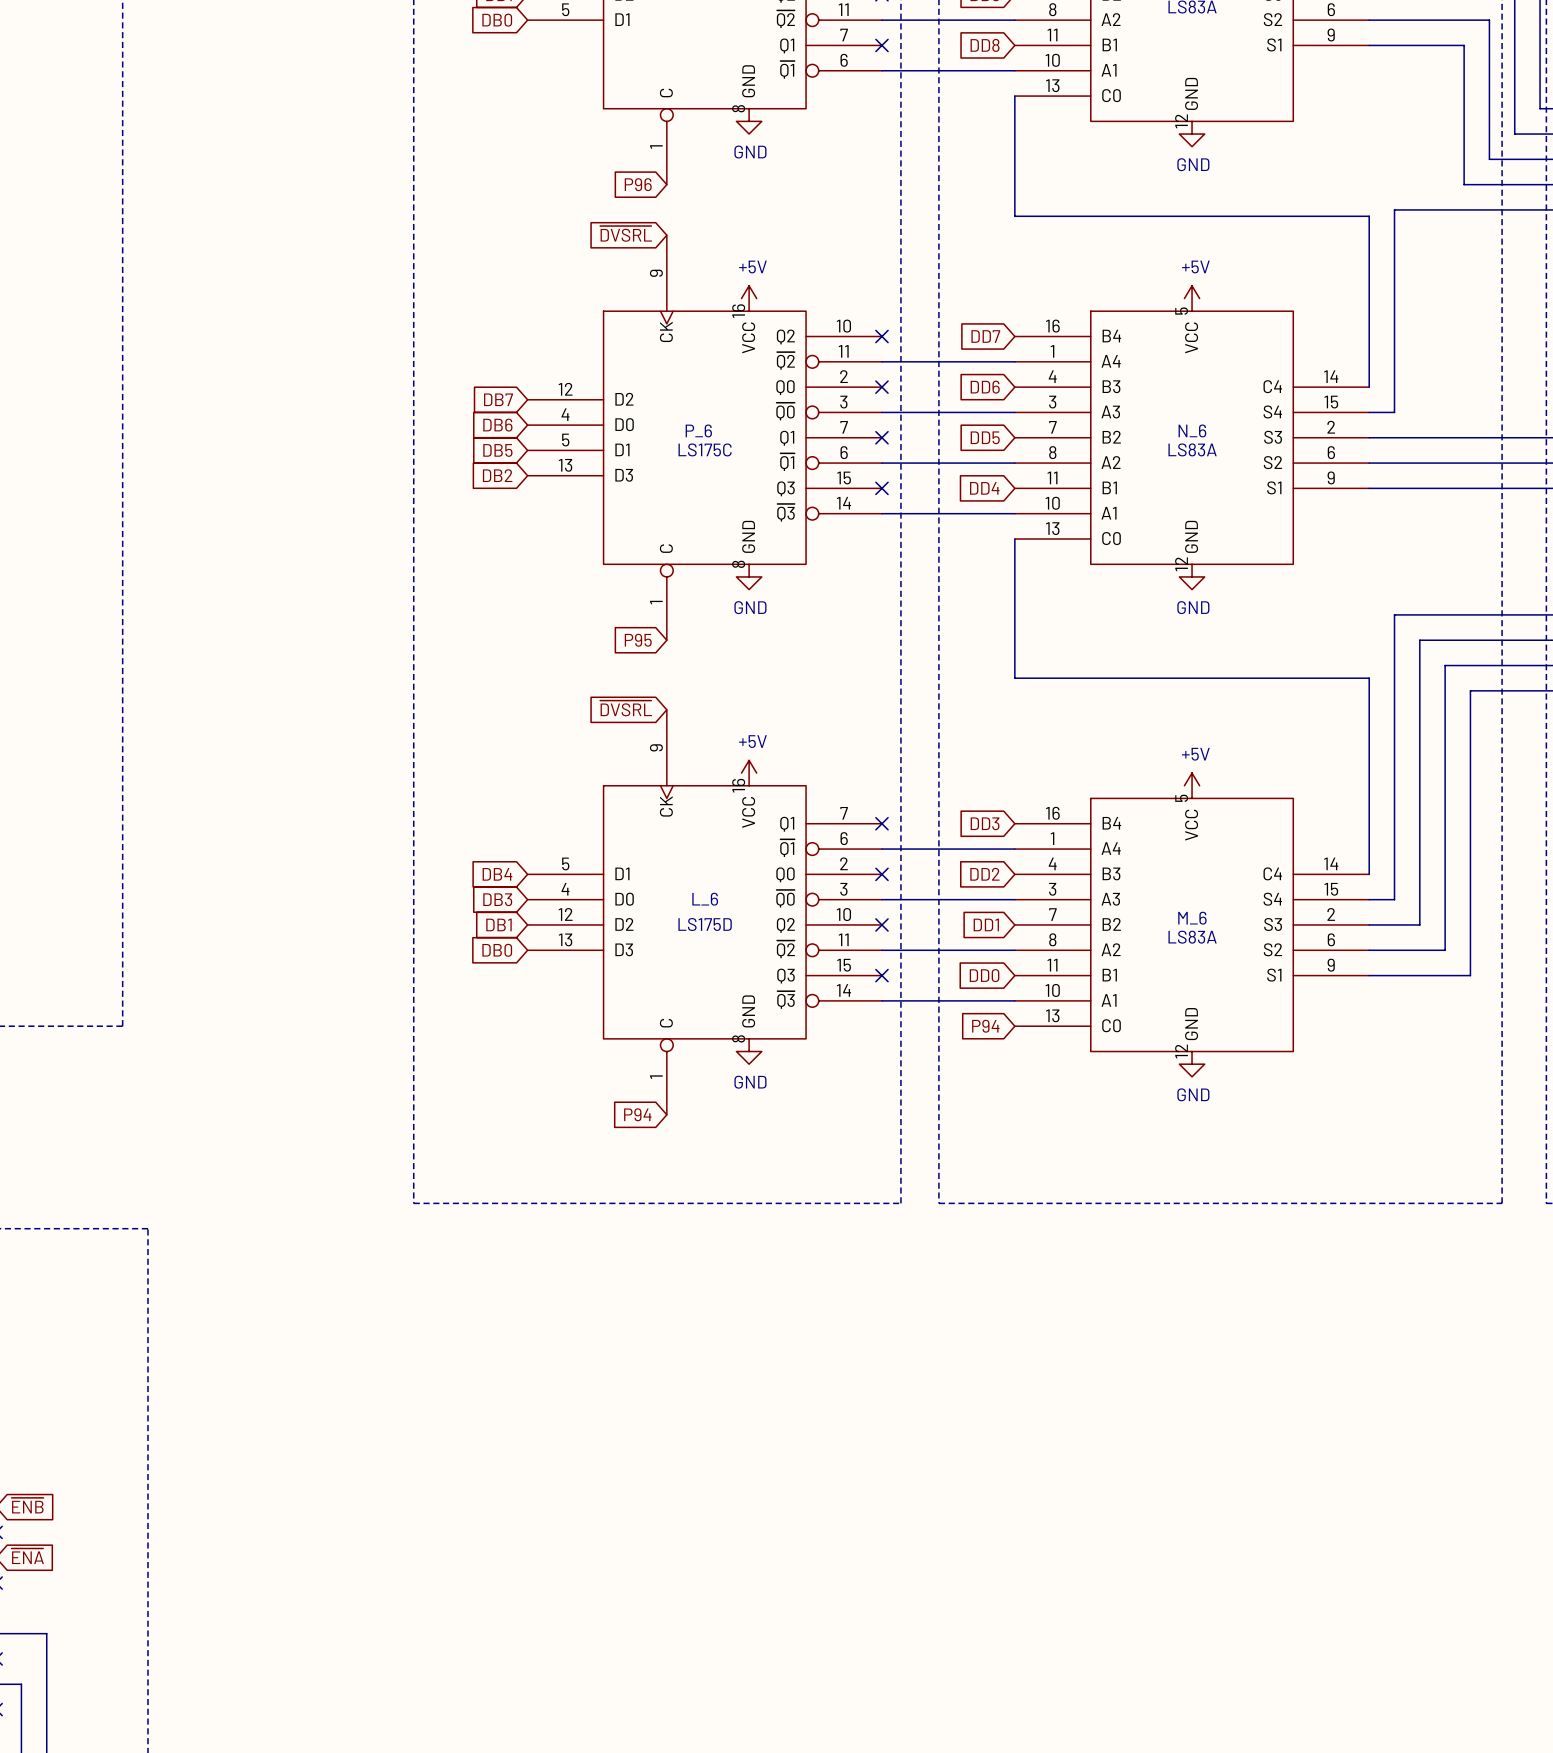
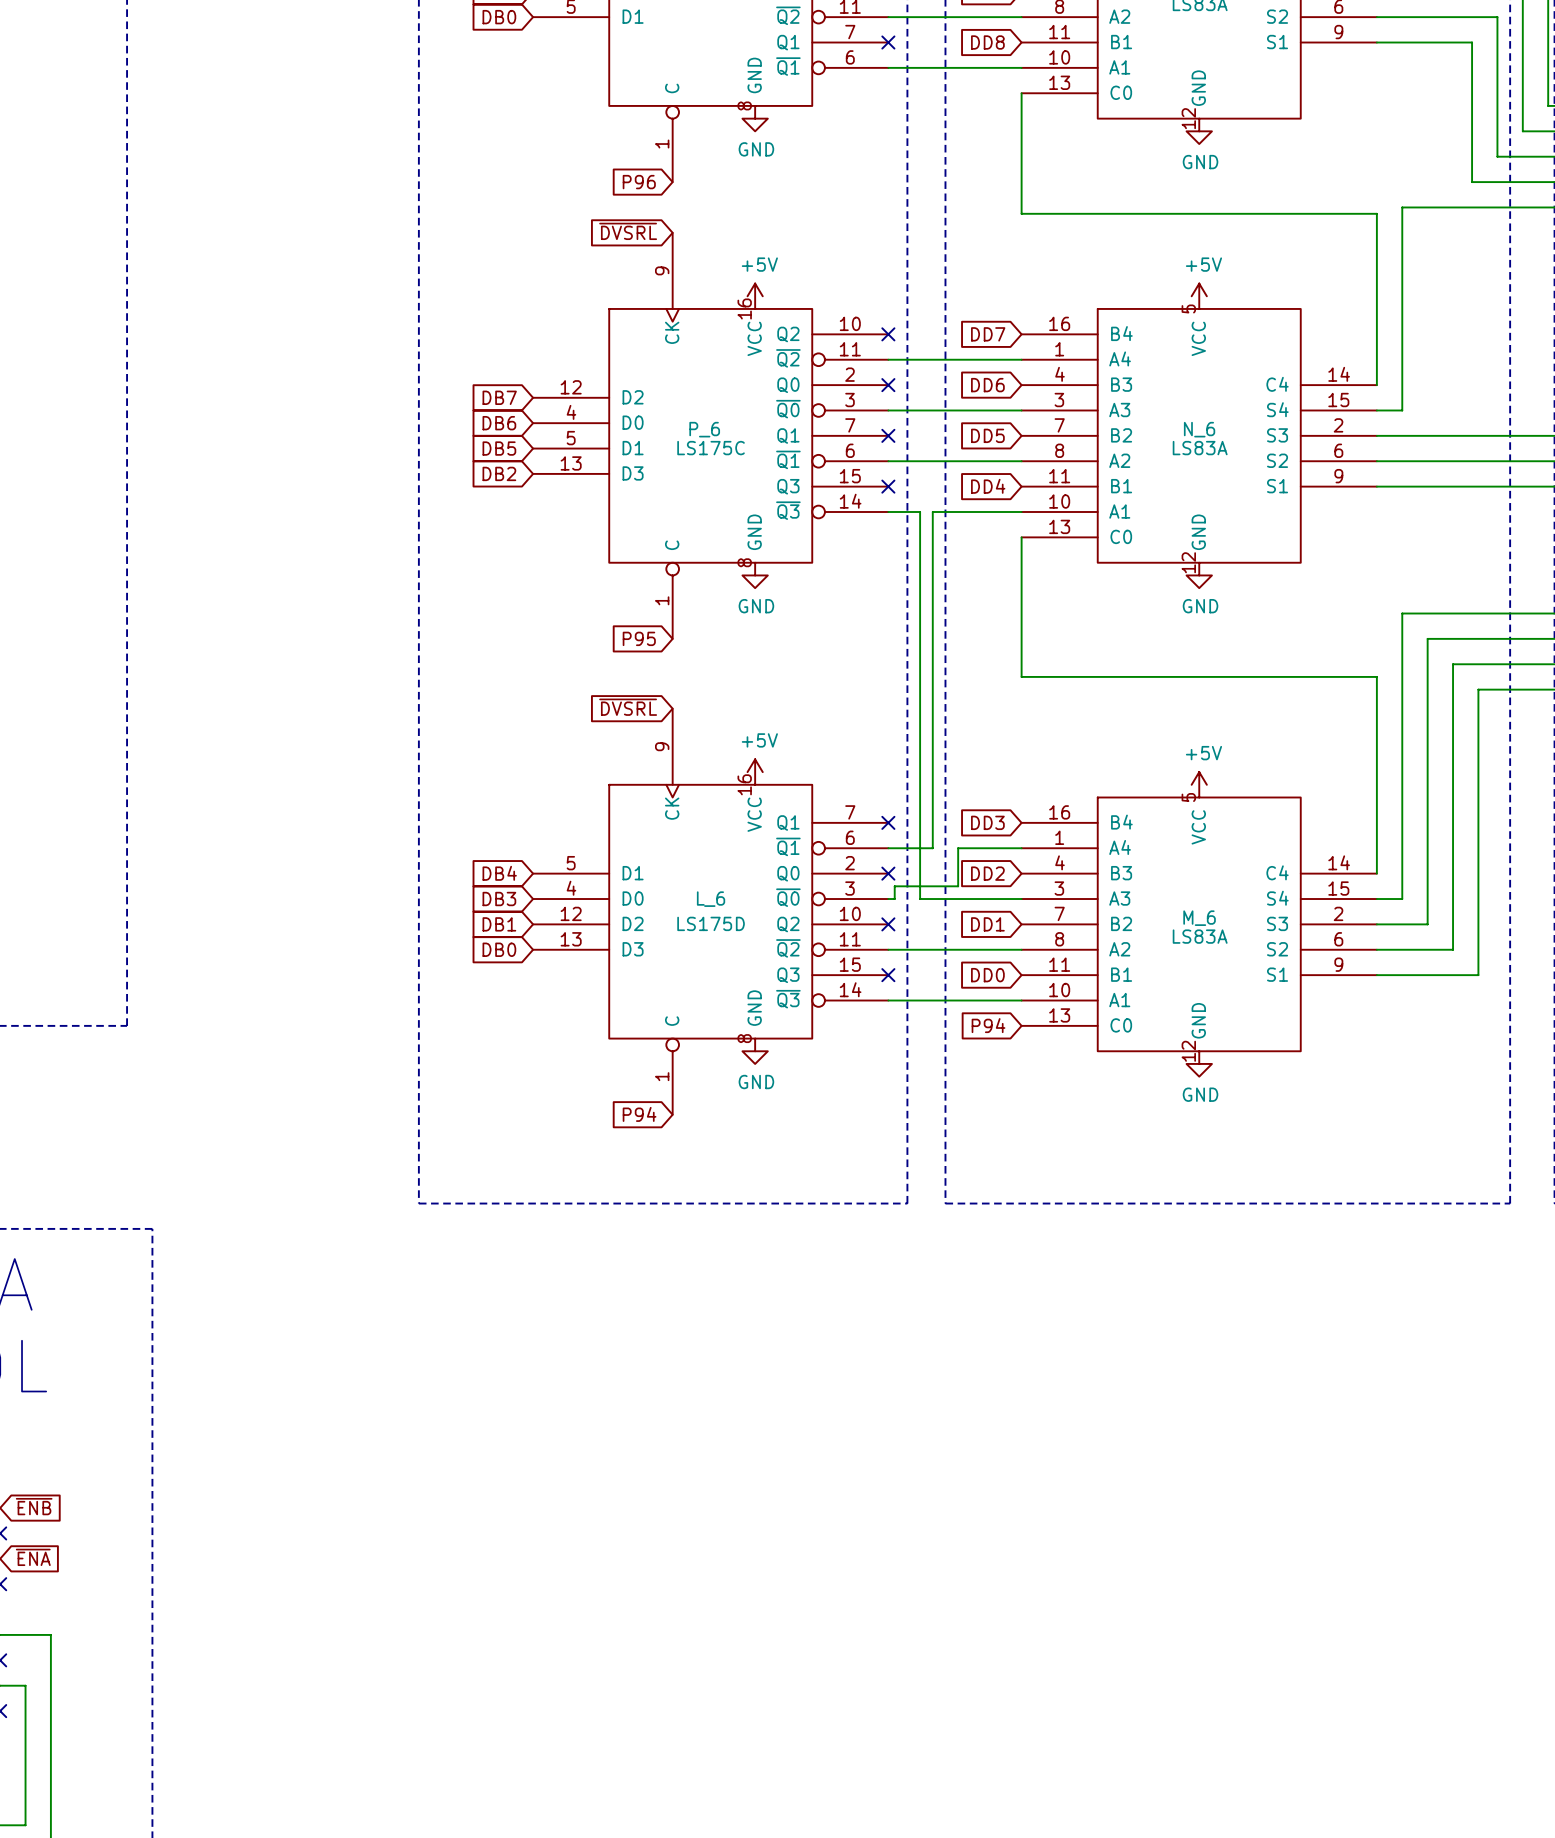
wire: (913, 513) (926, 513) -> (932, 848) (932, 511)
wire: (926, 849) (951, 849) -> (894, 899) (894, 886) (958, 886) (958, 848)
wire: (888, 899) (913, 899) -> (920, 511) (920, 899)

